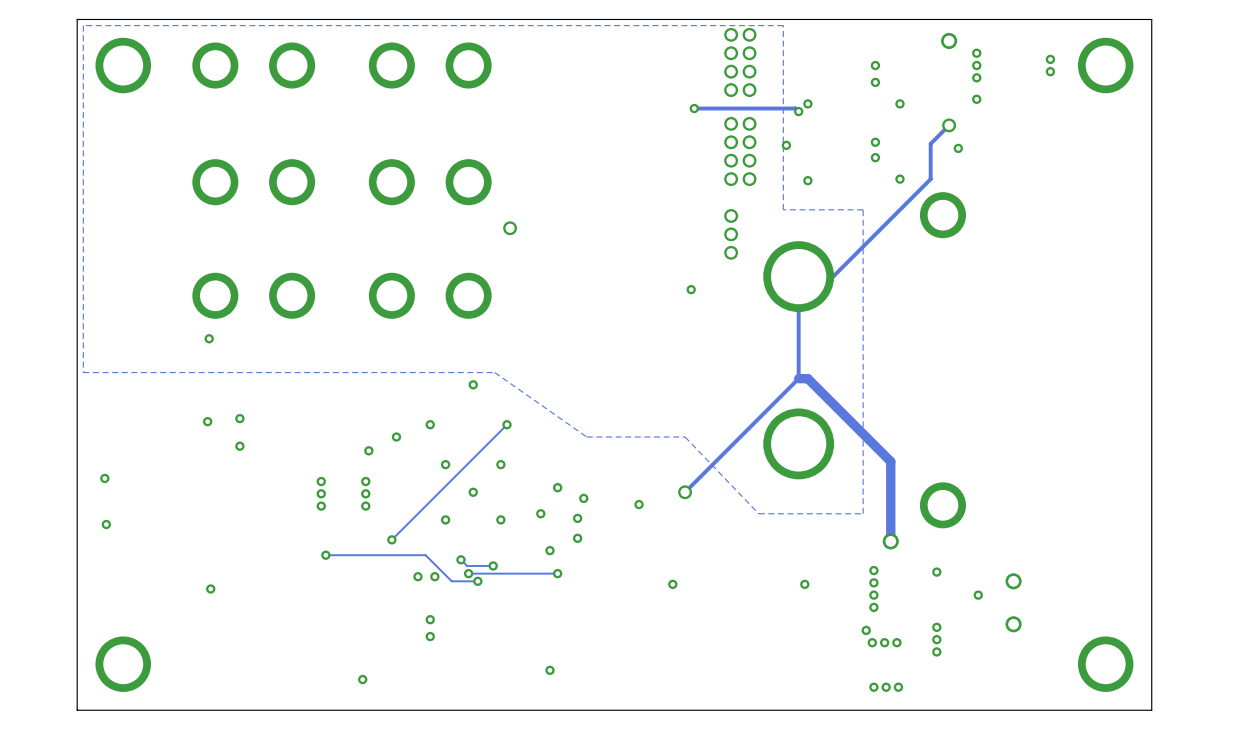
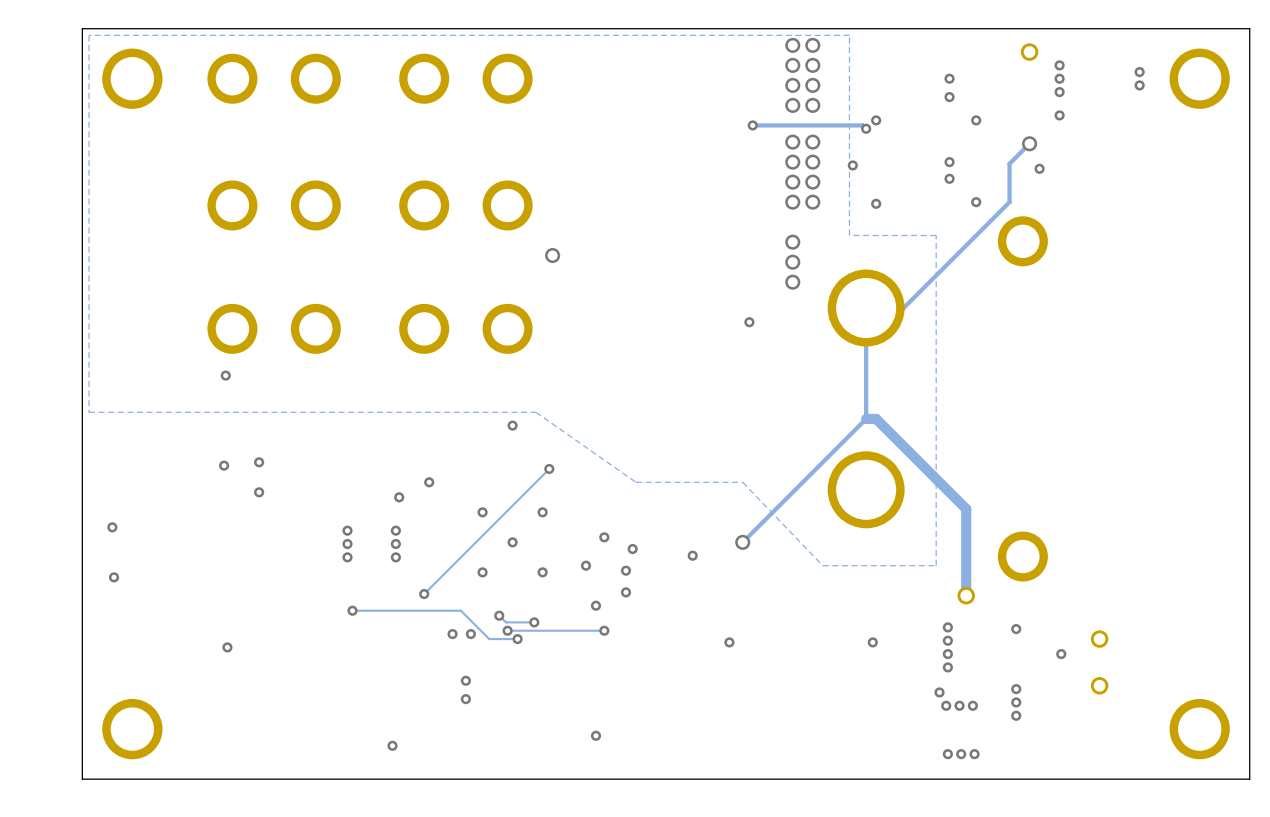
via: (430, 424) -> none

